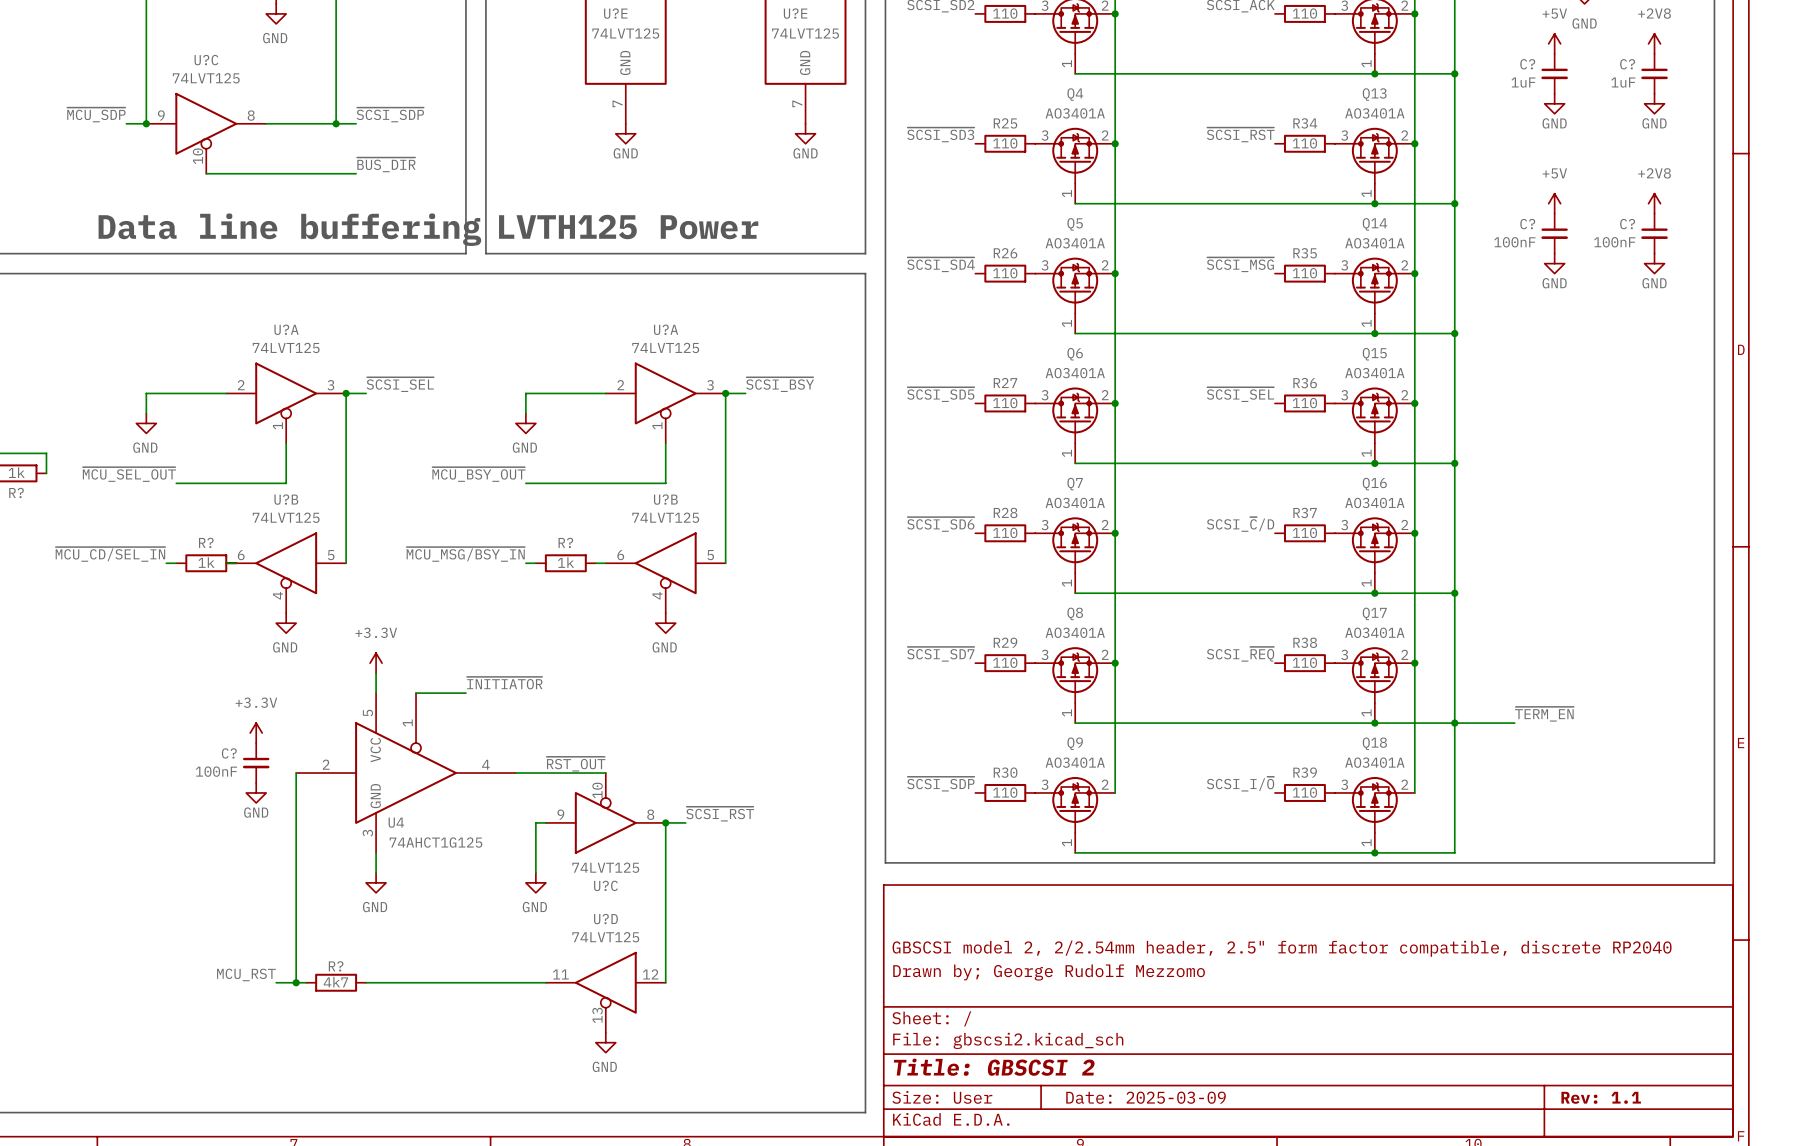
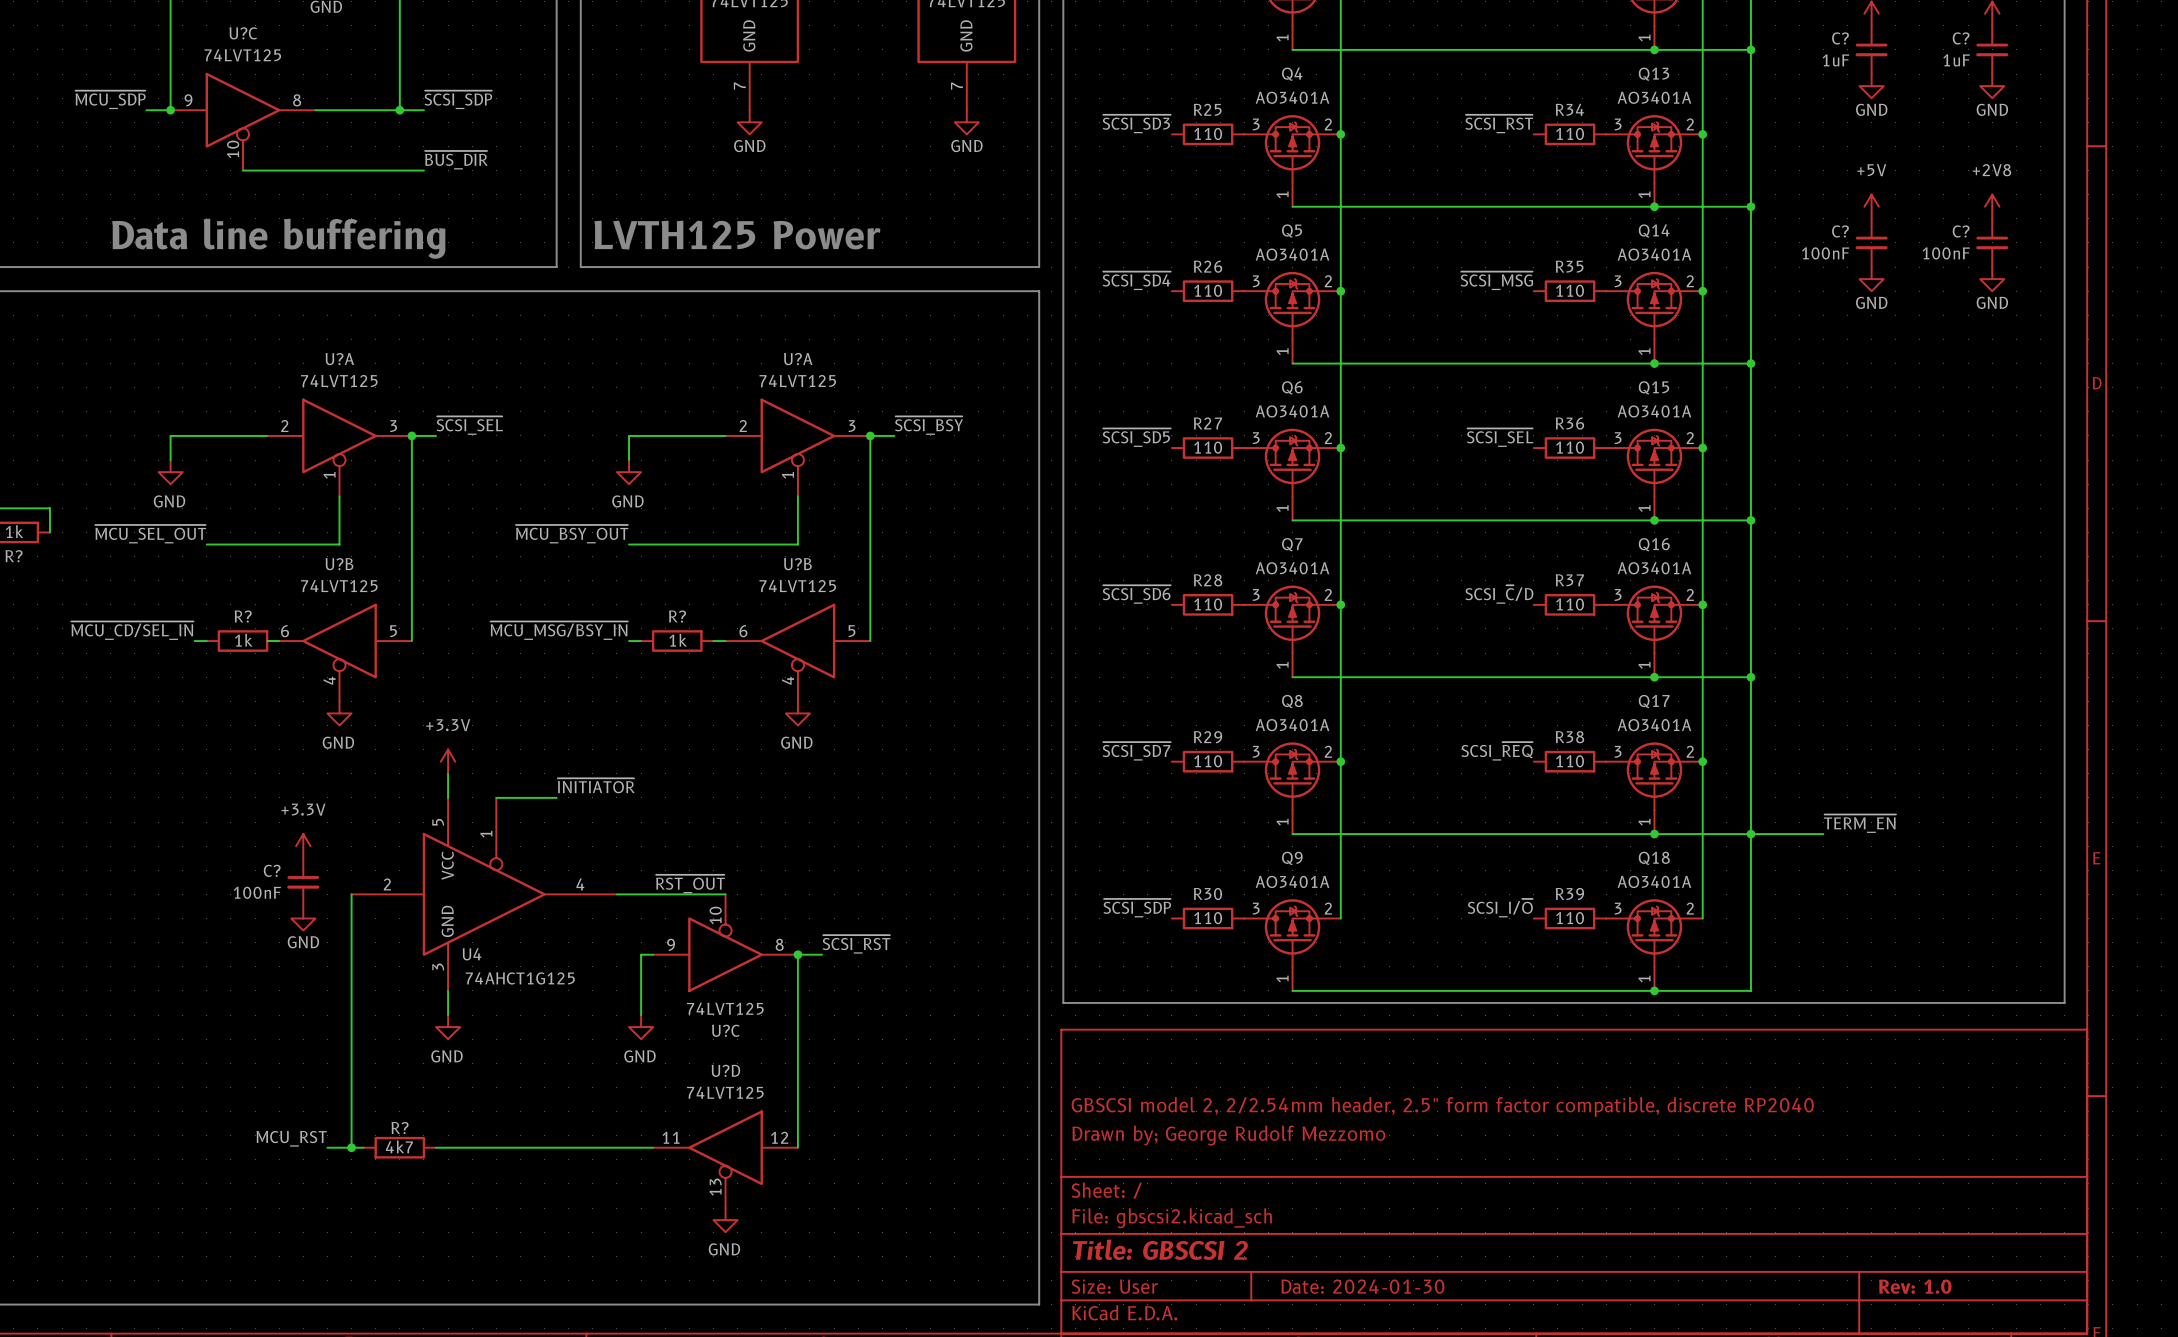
title block: Date: 2025-03-09 (1146, 1097) -> Date: 2024-01-30 (1362, 1286)
title block: Rev: 1.1 (1601, 1097) -> Rev: 1.0 (1915, 1286)

